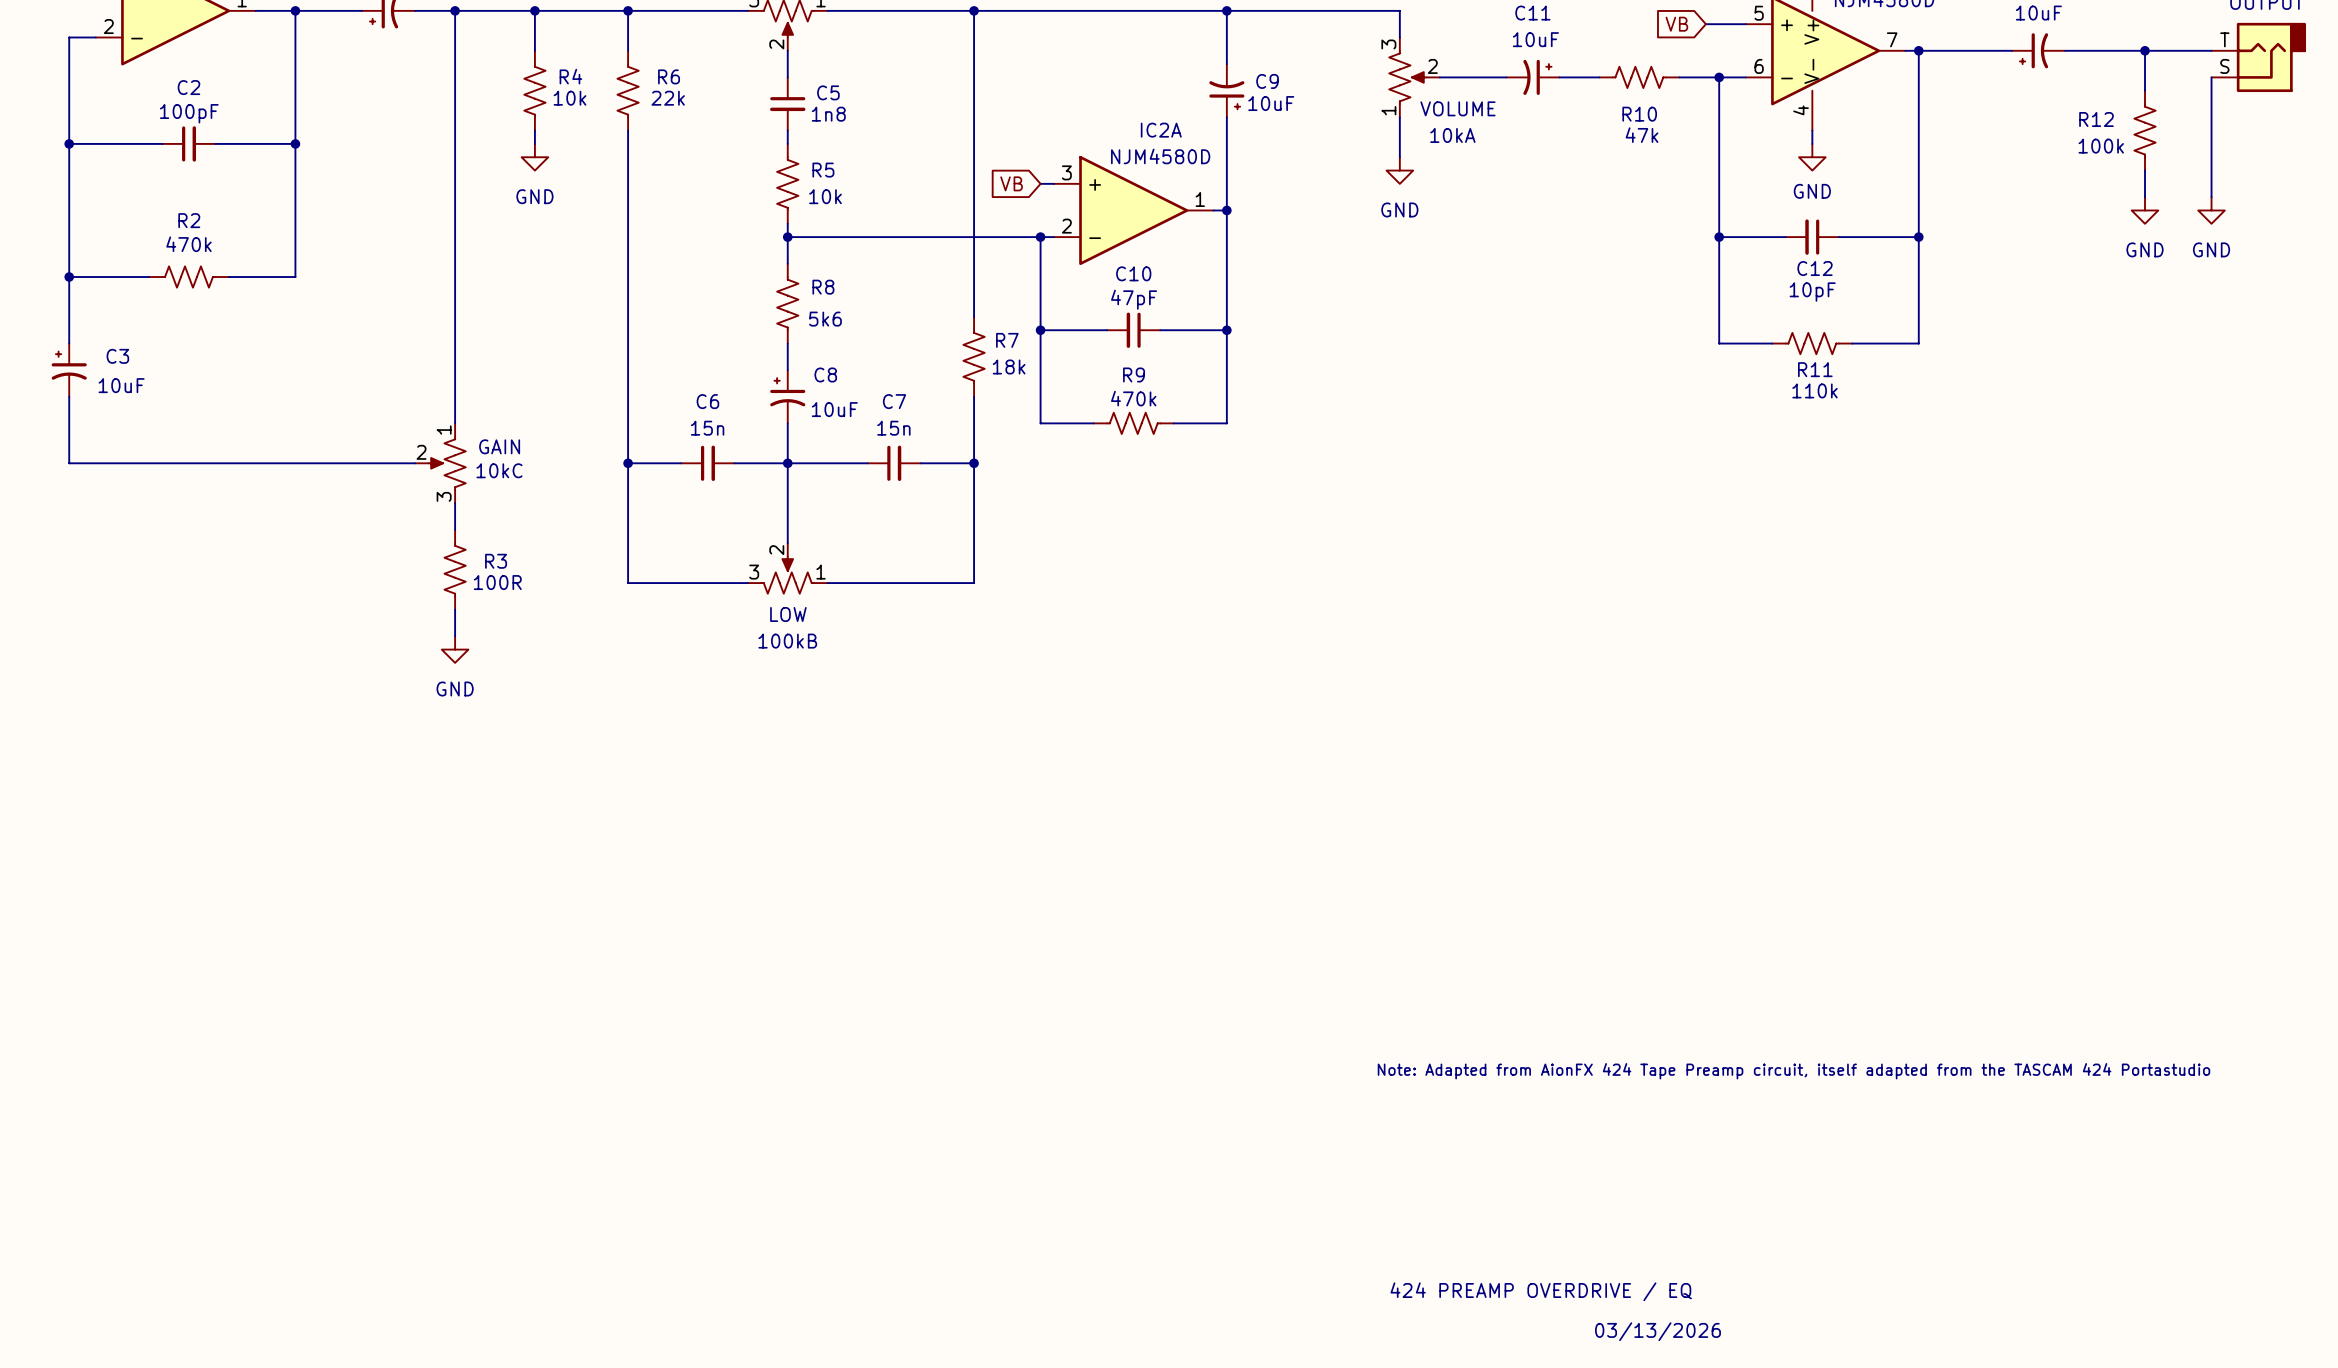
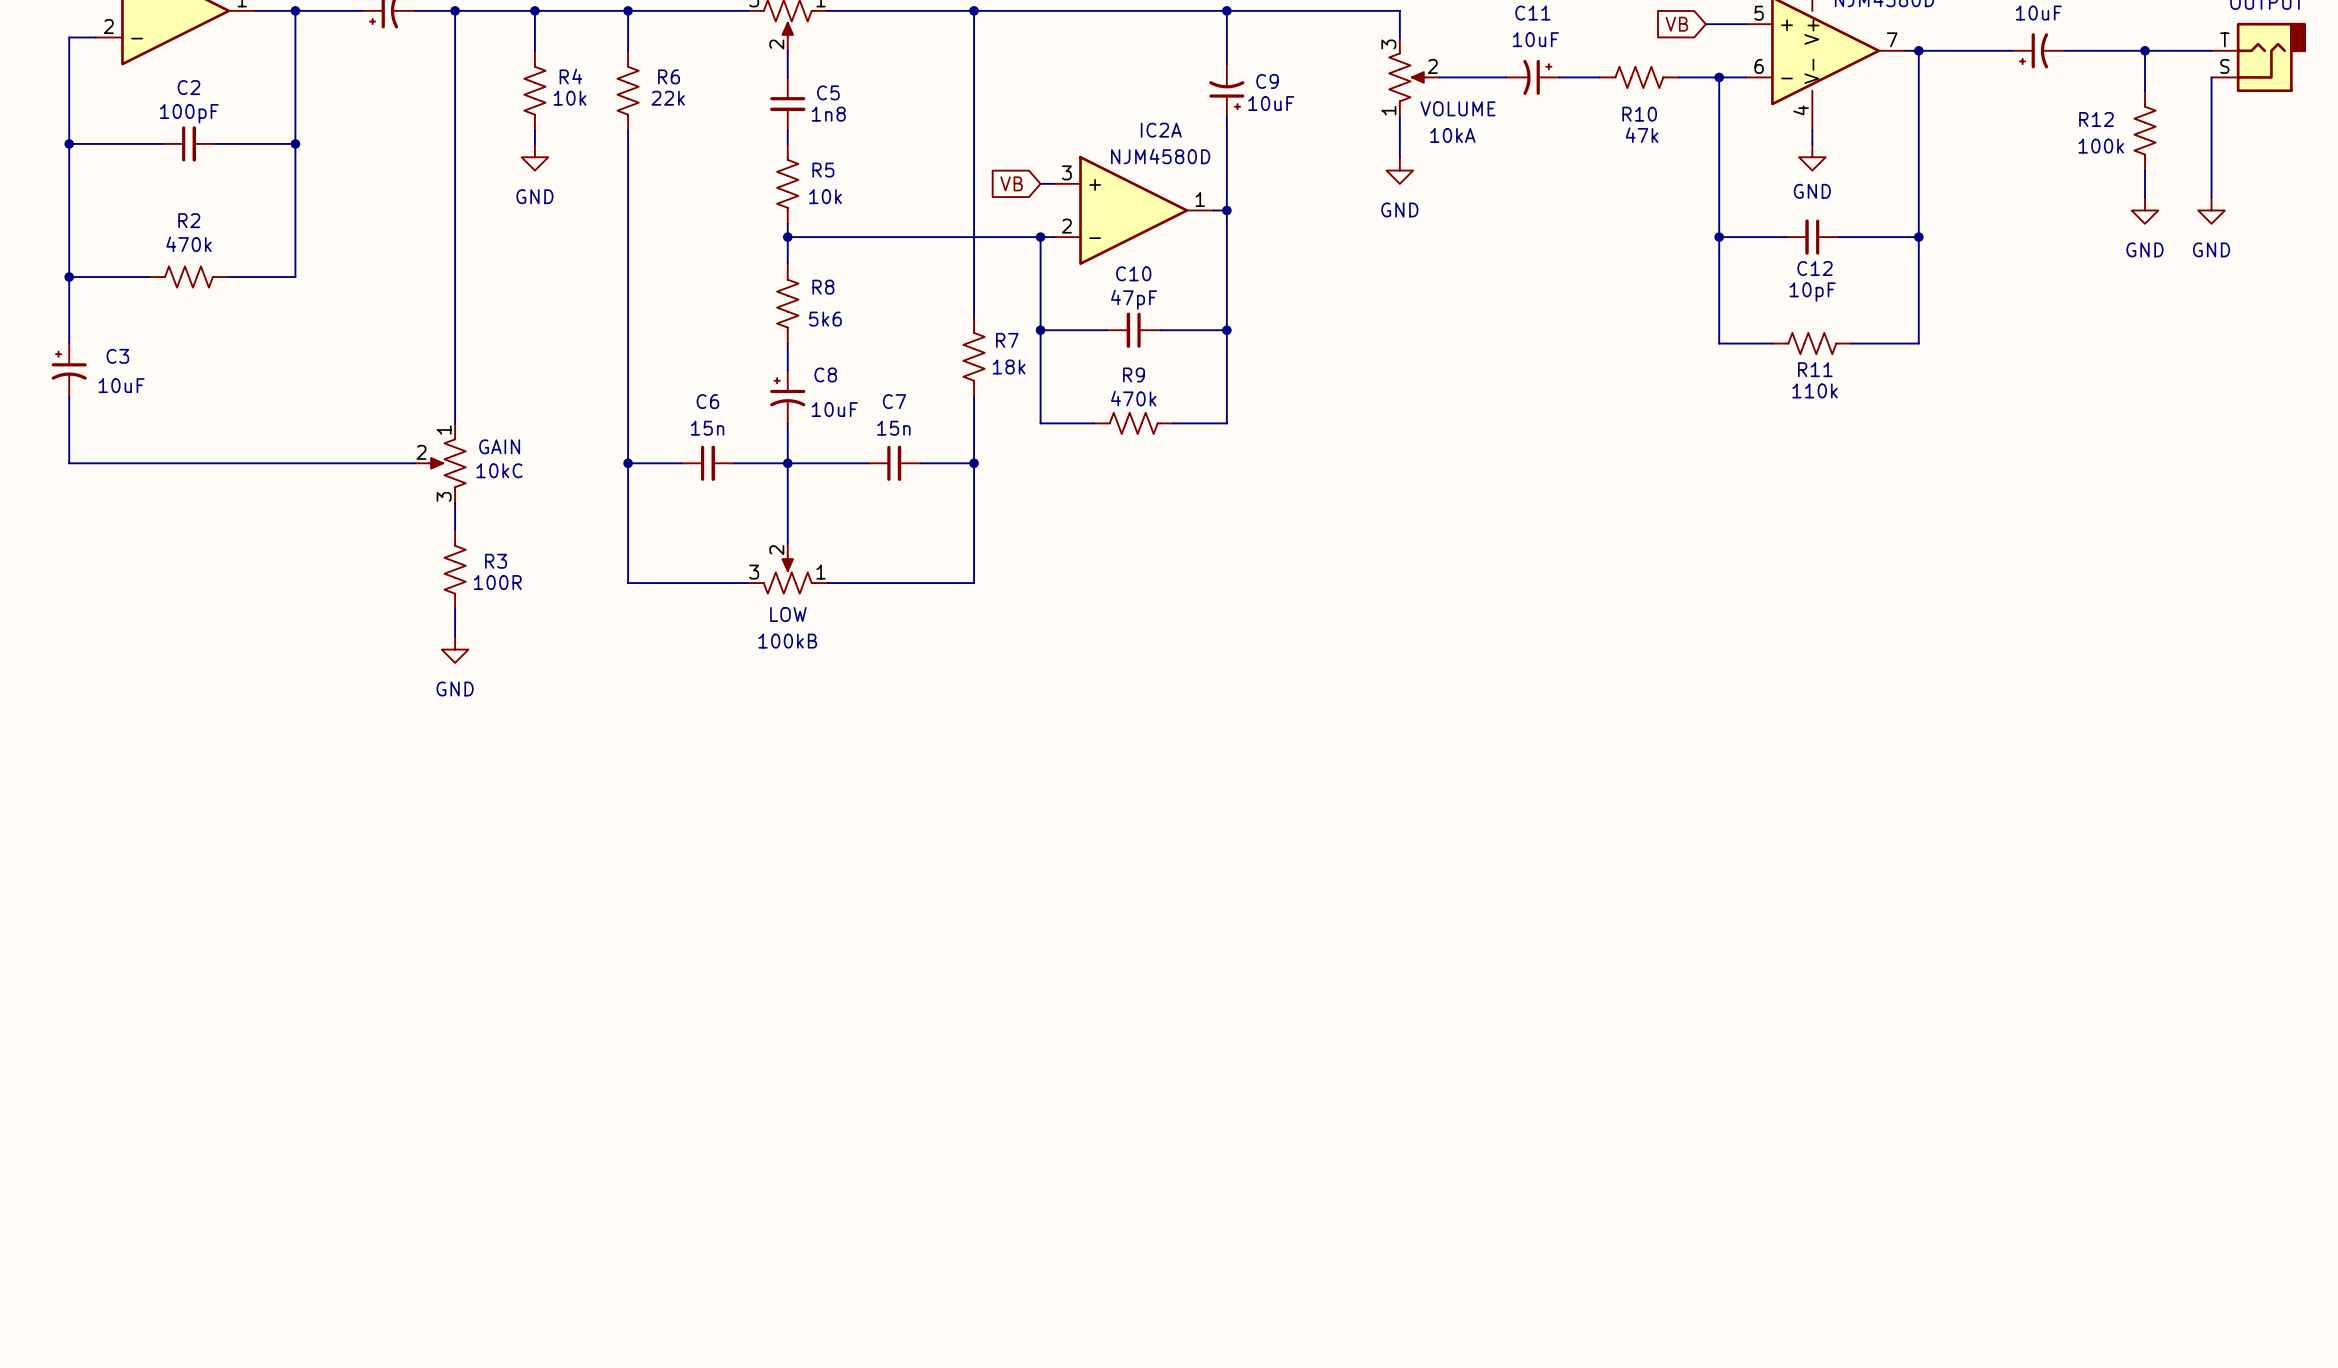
text: Note: Adapted from AionFX 424 Tape Preamp circuit, itself adapted from the TASCAM 424 Portastudio (1793, 1071) -> none
text: 424 PREAMP OVERDRIVE / EQ (1541, 1291) -> none
text: 03/13/2026 (1657, 1331) -> none

